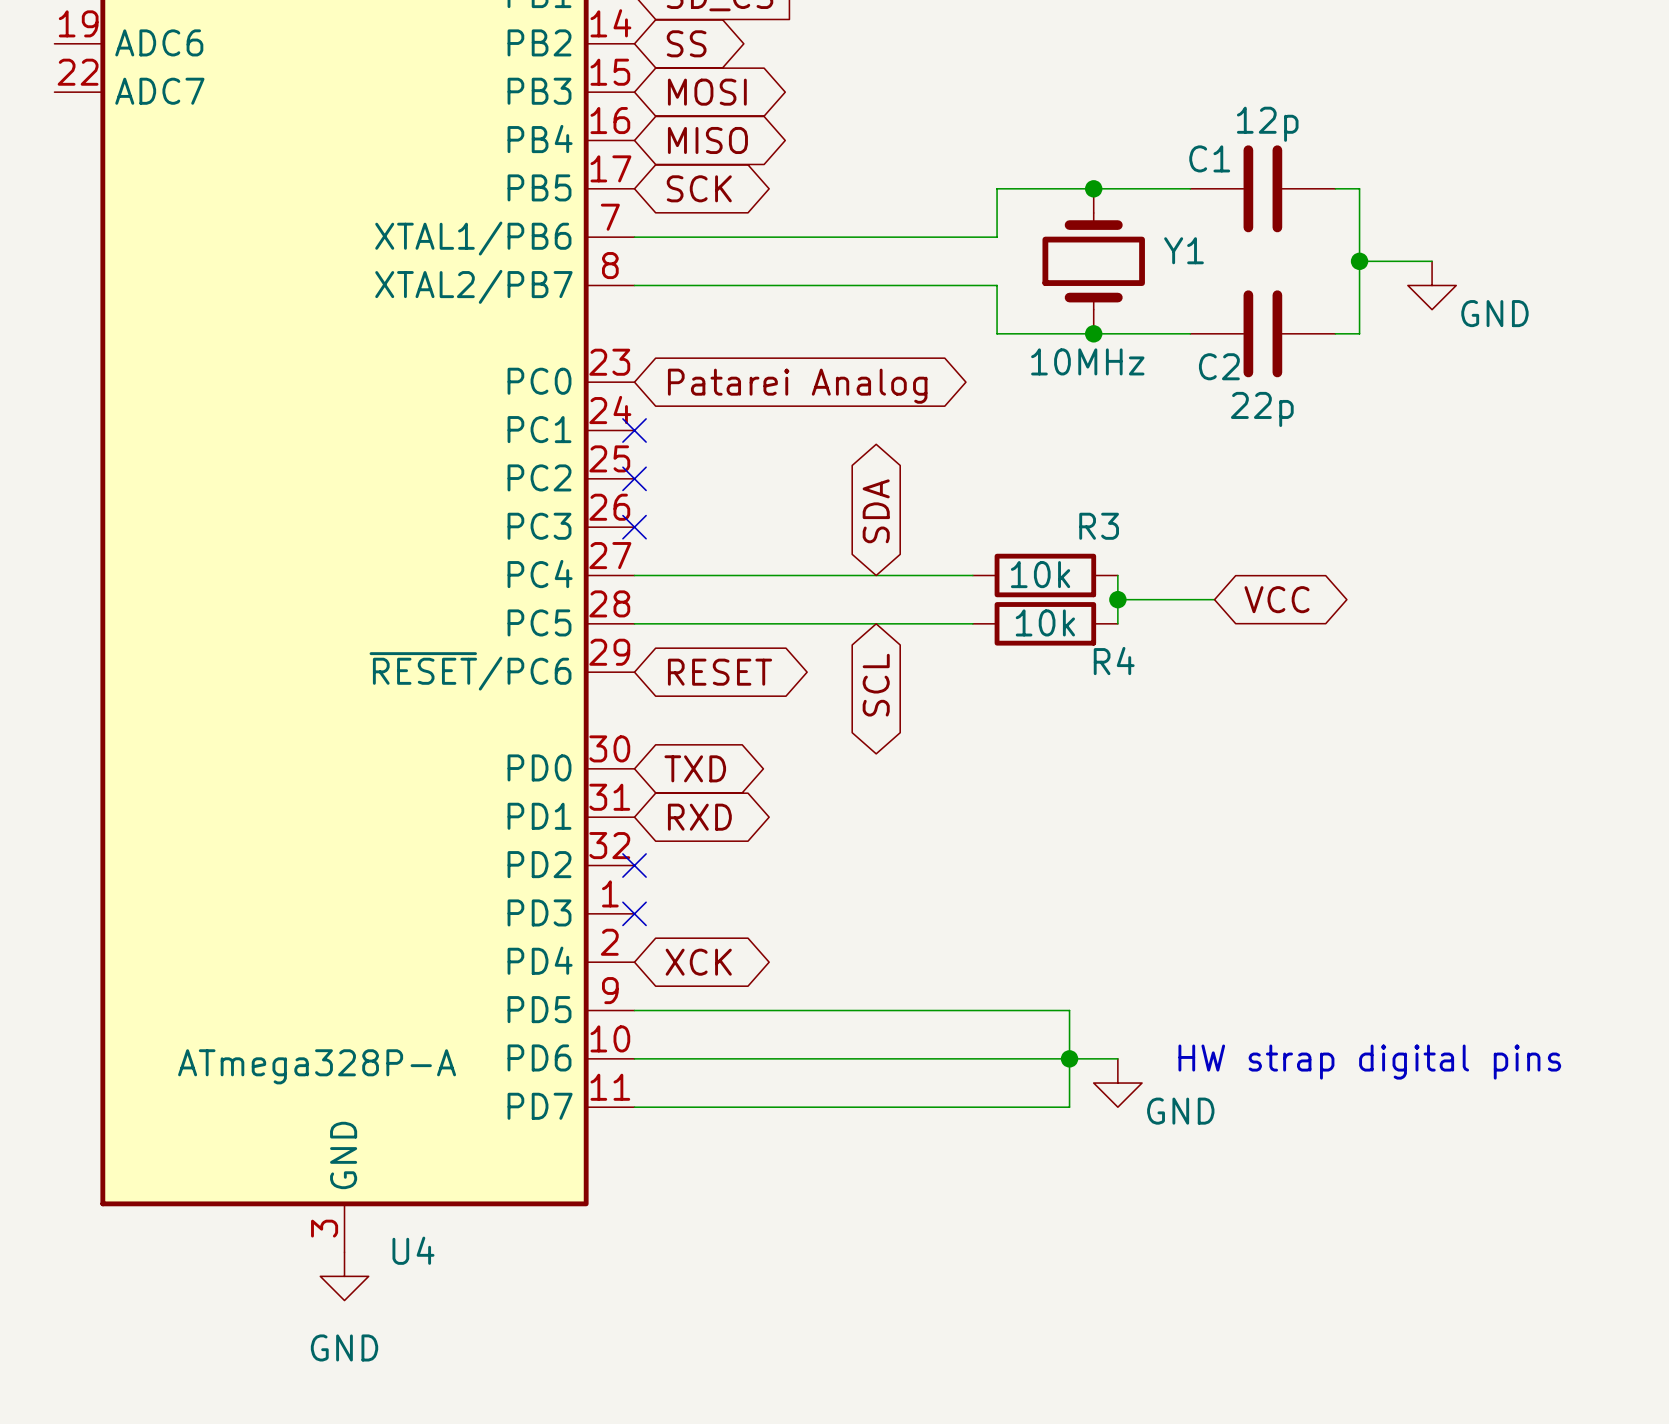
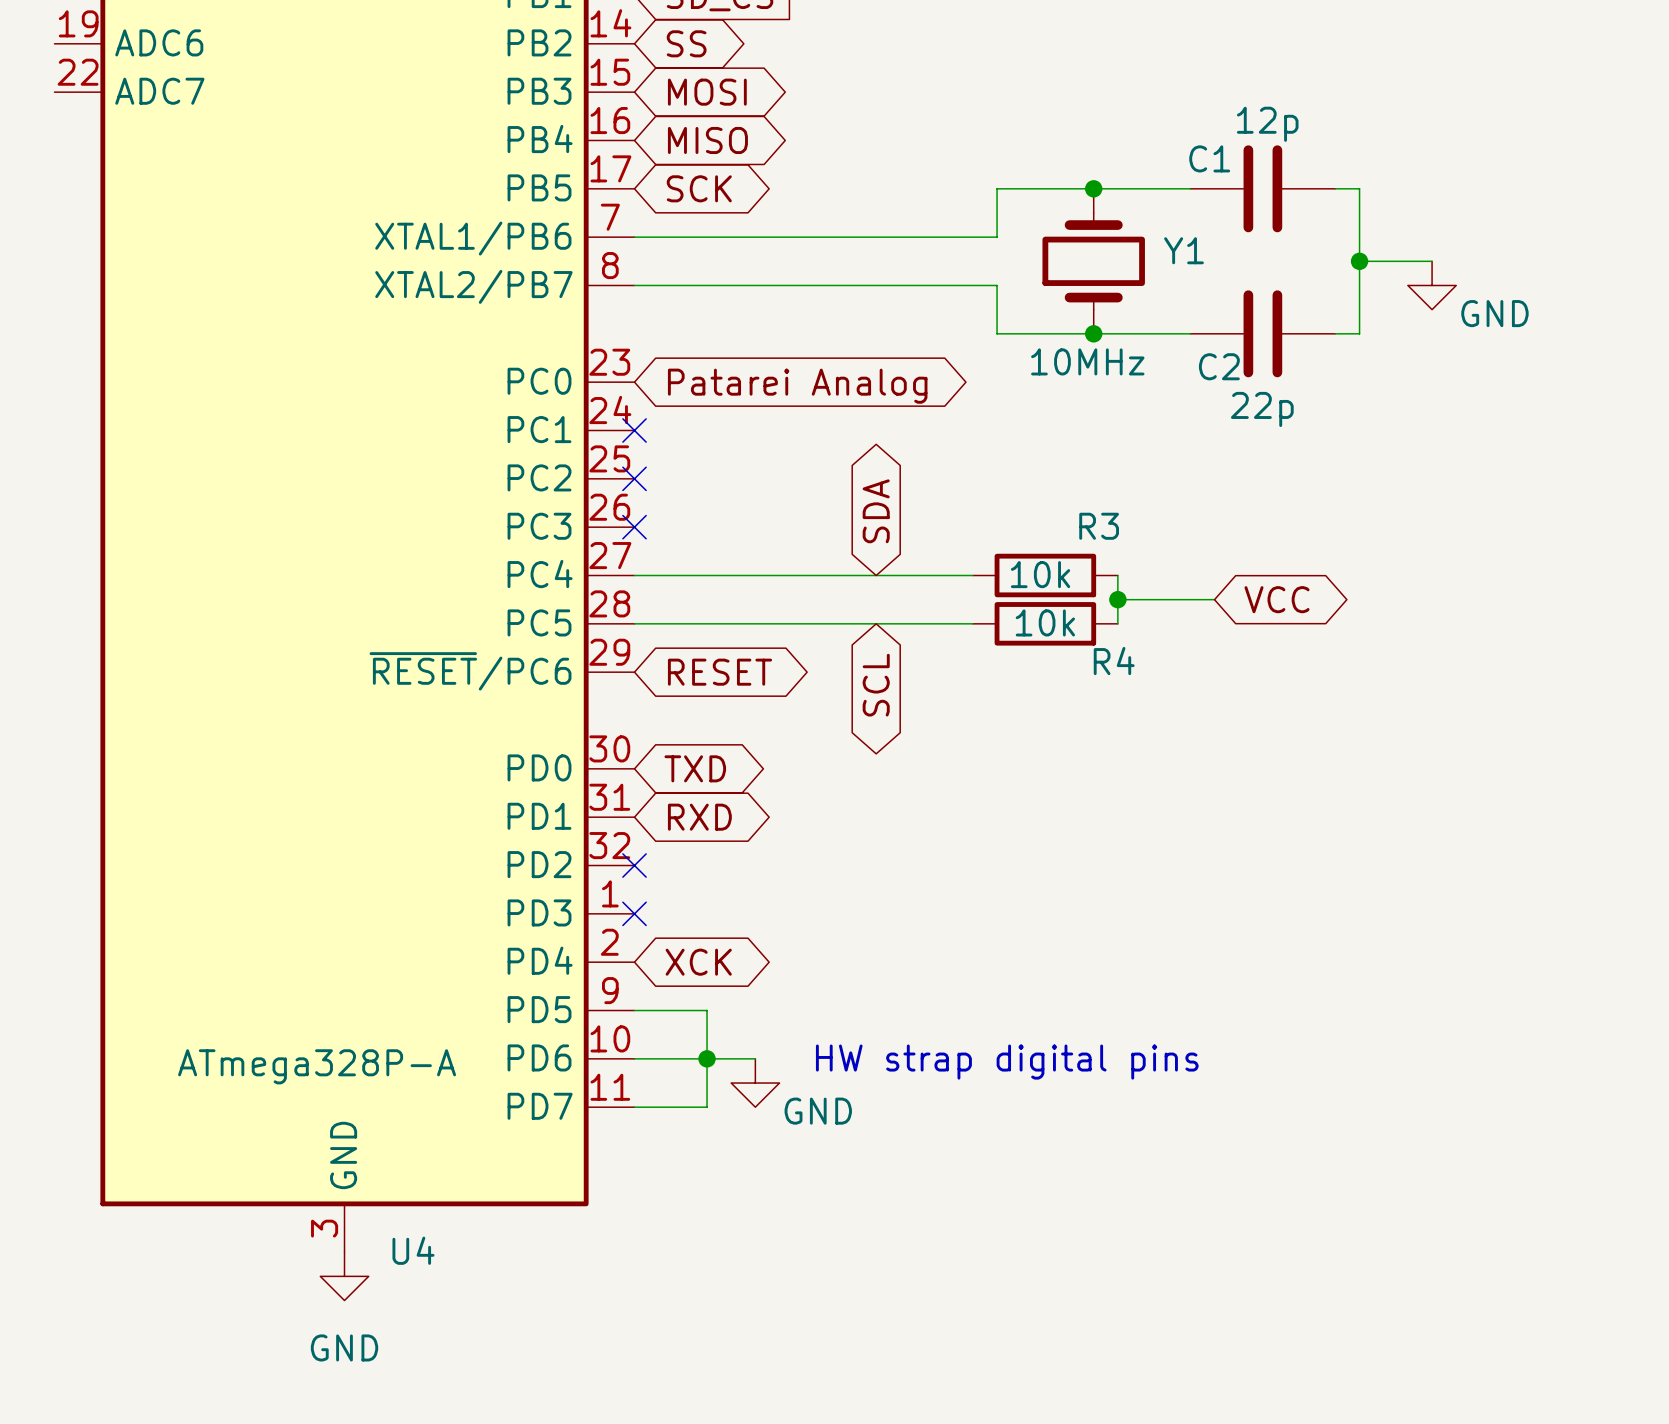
wire: (707, 1010) (1069, 1010) (1069, 1107) (707, 1107) -> (707, 1010) (707, 1107)
junction: none -> (707, 1058)
wire: (755, 1058) (1117, 1058) -> none
junction: (1069, 1058) -> none
text position: HW strap digital pins (1369, 1062) -> HW strap digital pins (1007, 1062)
power symbol position: GND (1117, 1083) -> GND (755, 1083)

